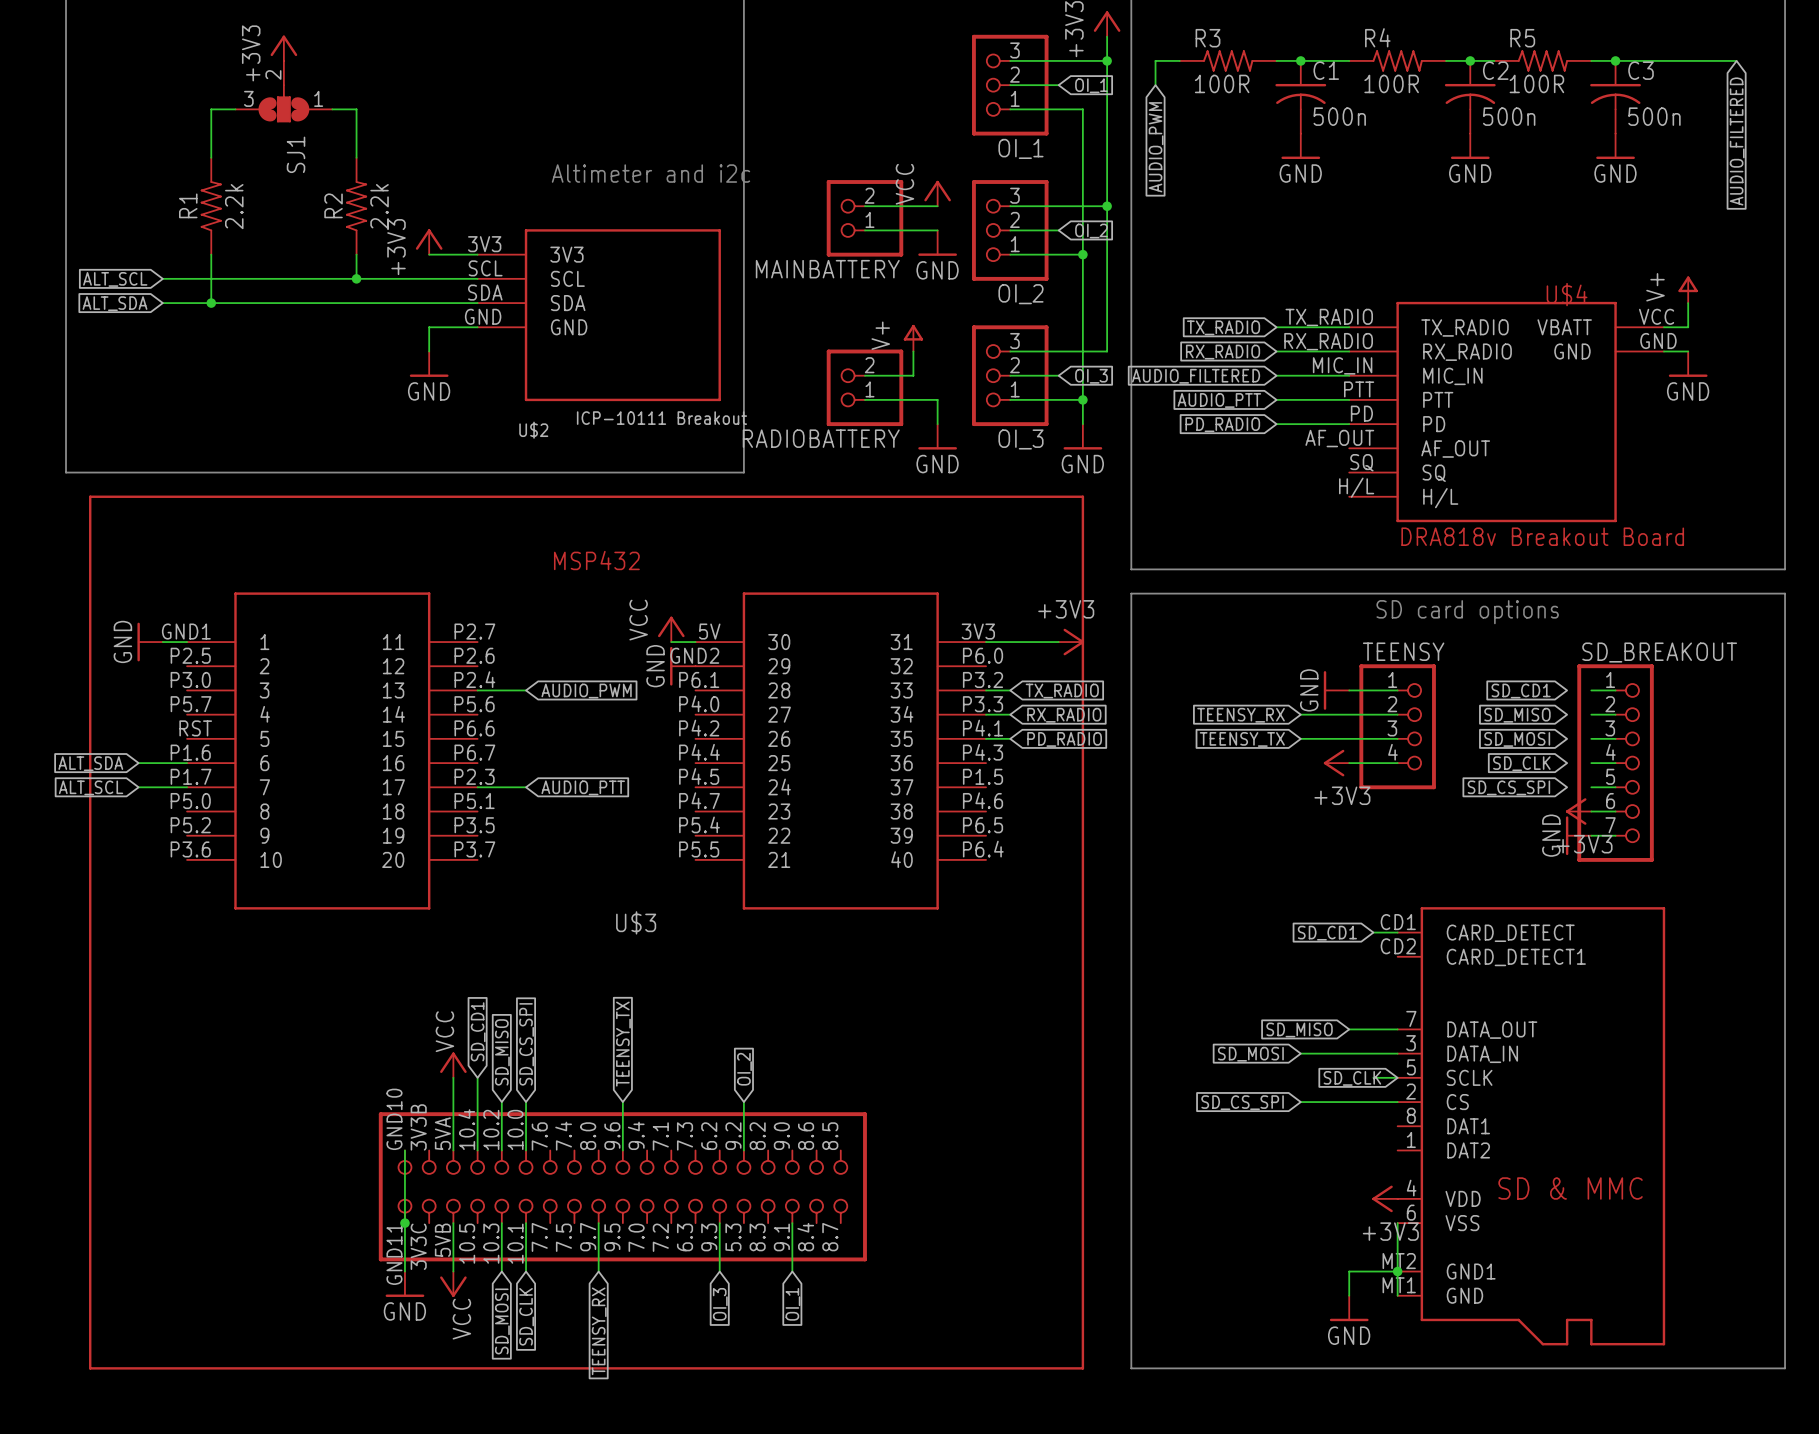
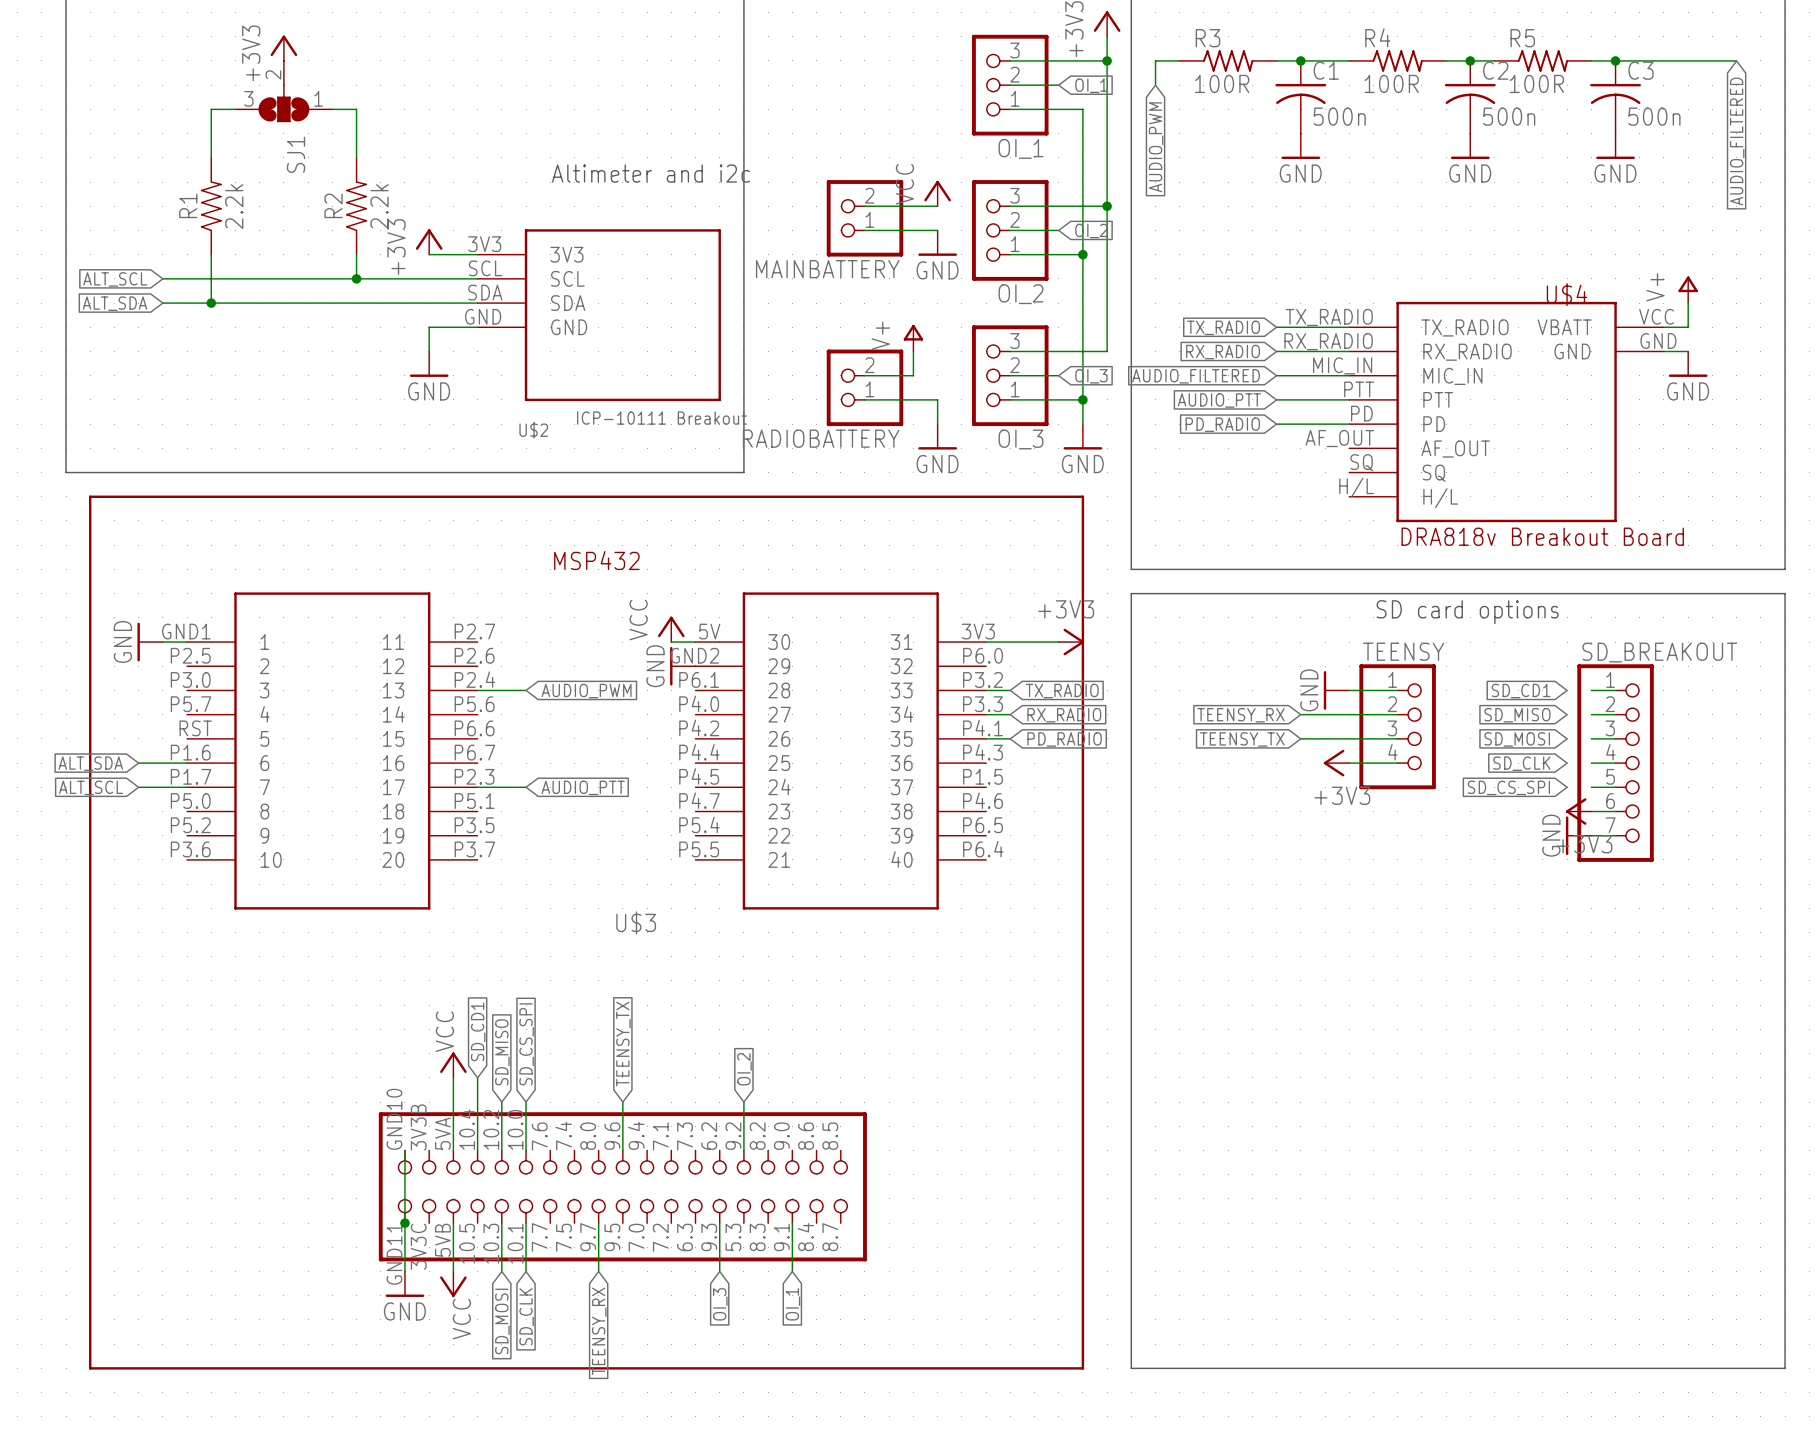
wire: (1373, 932) (1397, 932) -> none
global label: SD_CD1 (1327, 933) -> none
global label: SD_MISO (1299, 1029) -> none
wire: (1349, 1029) (1397, 1029) -> none
wire: (1300, 1053) (1397, 1053) -> none
global label: SD_MOSI (1250, 1054) -> none
wire: (1373, 1077) (1397, 1077) -> none
global label: SD_CLK (1352, 1078) -> none
global label: SD_CS_SPI (1242, 1102) -> none
wire: (1300, 1102) (1397, 1102) -> none
part: (1531, 1126) -> none
power symbol: +3V3 (1384, 1198) -> none
wire: (1397, 1223) (1397, 1295) -> none
wire: (1397, 1271) (1349, 1271) (1349, 1295) -> none
junction: (1397, 1271) -> none
power symbol: GND (1349, 1308) -> none

